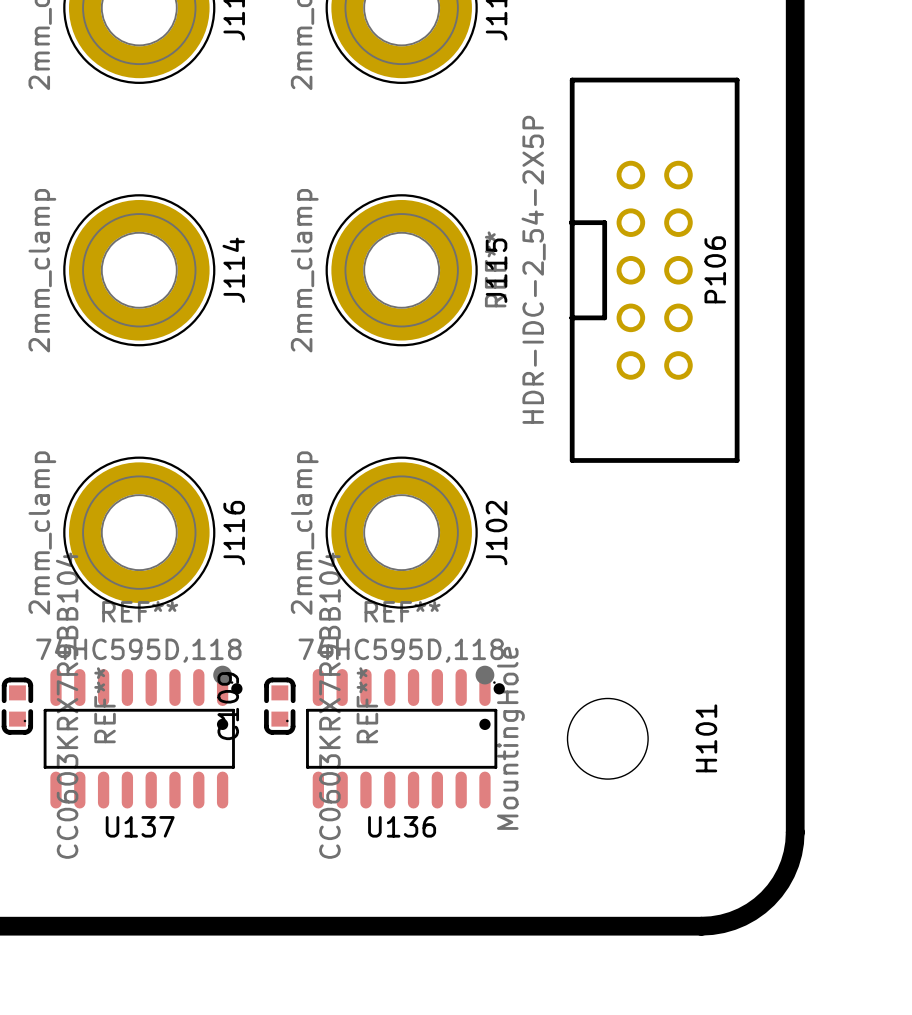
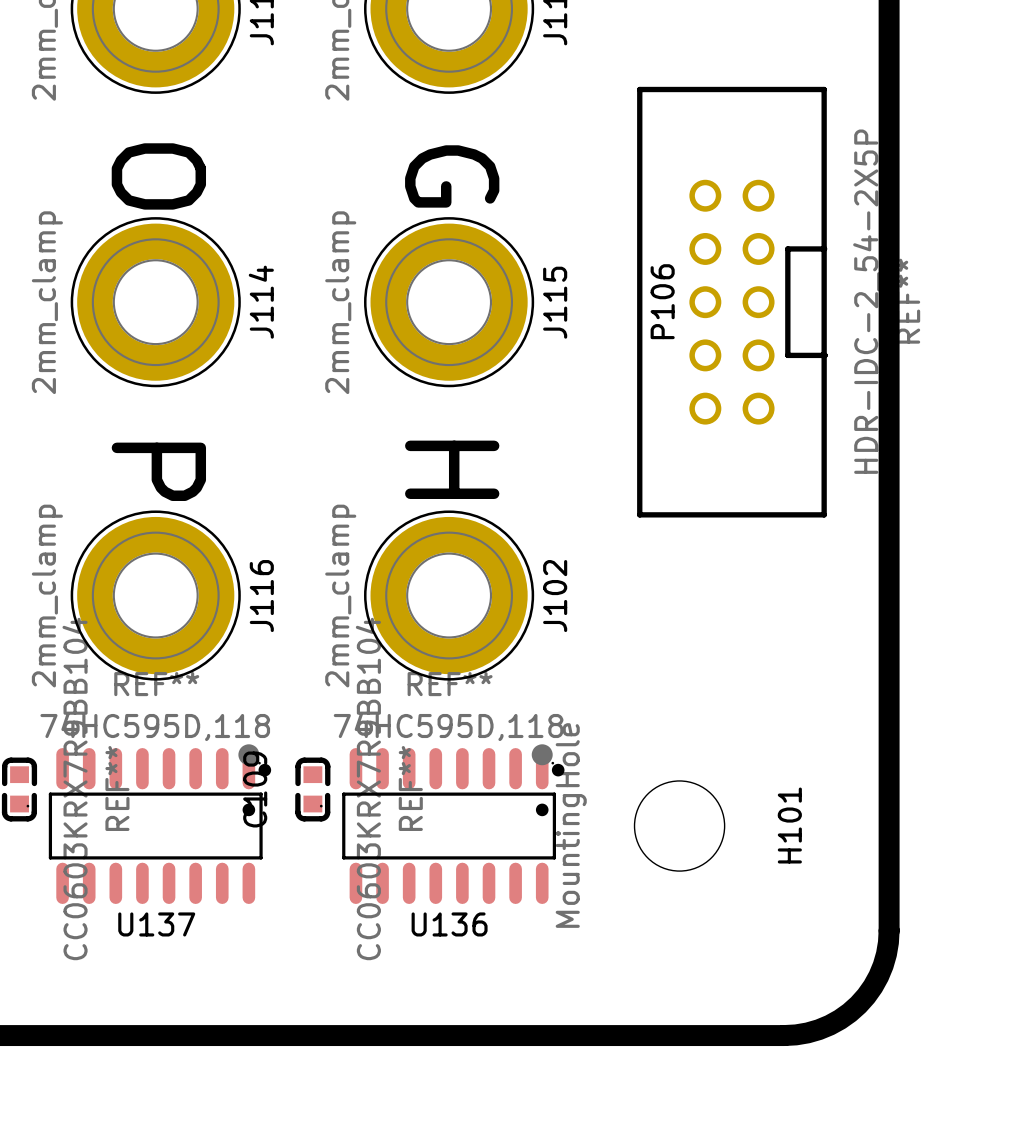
text: none -> O (158, 176)
text: none -> G (452, 176)
P106 rotation: 0° (654, 270) -> 180° (732, 302)
text: none -> H (452, 469)
text: none -> P (158, 471)

